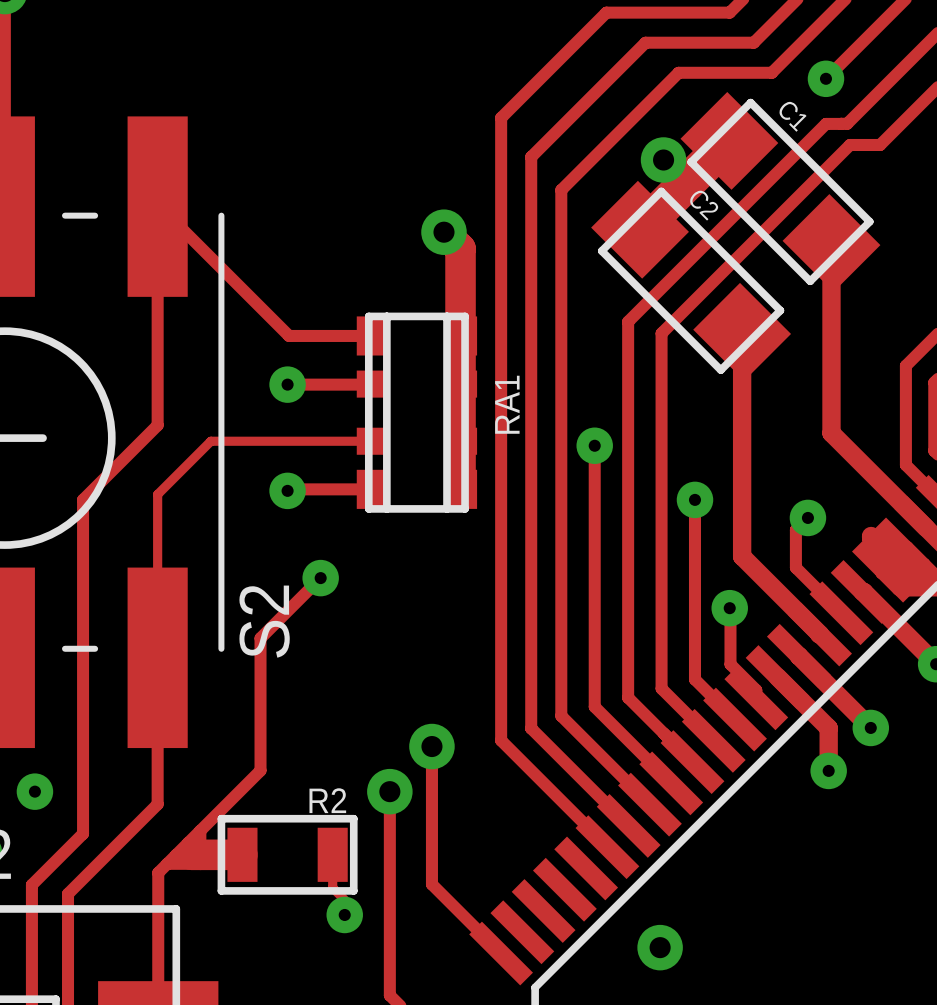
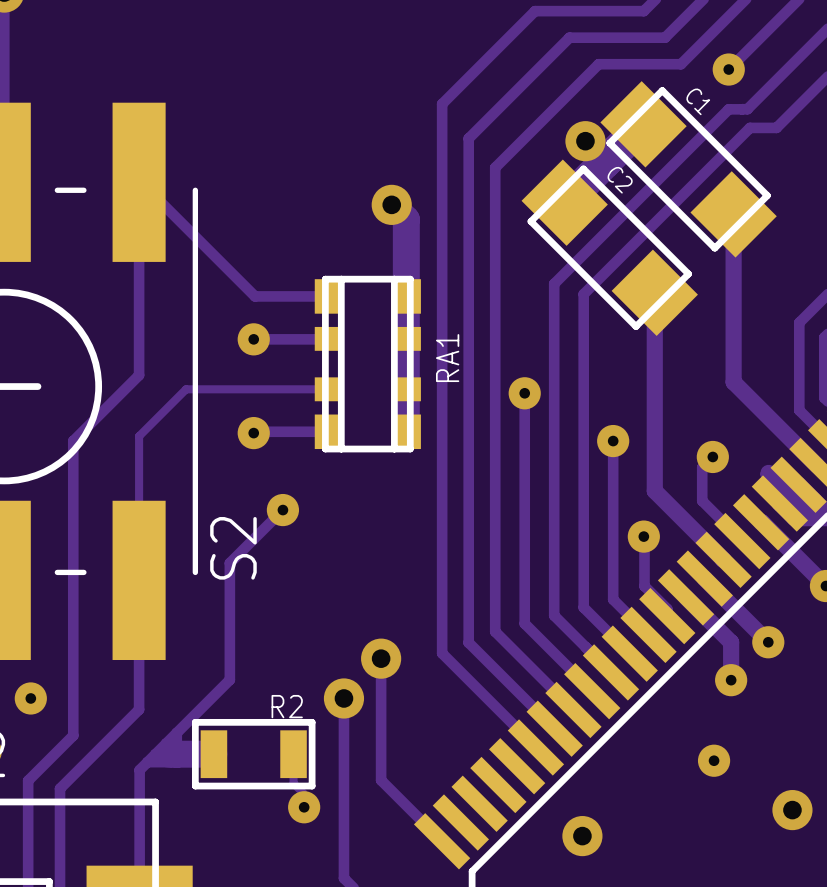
via: none -> (714, 760)
via: none -> (792, 810)

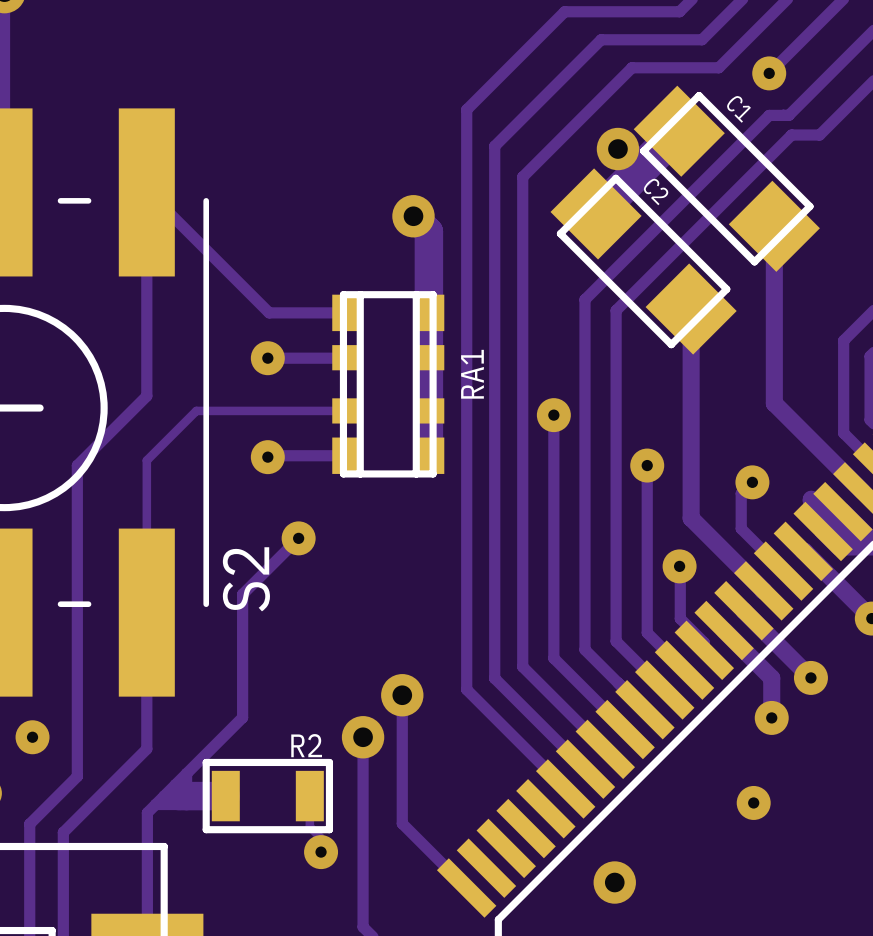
via: (792, 810) -> none

